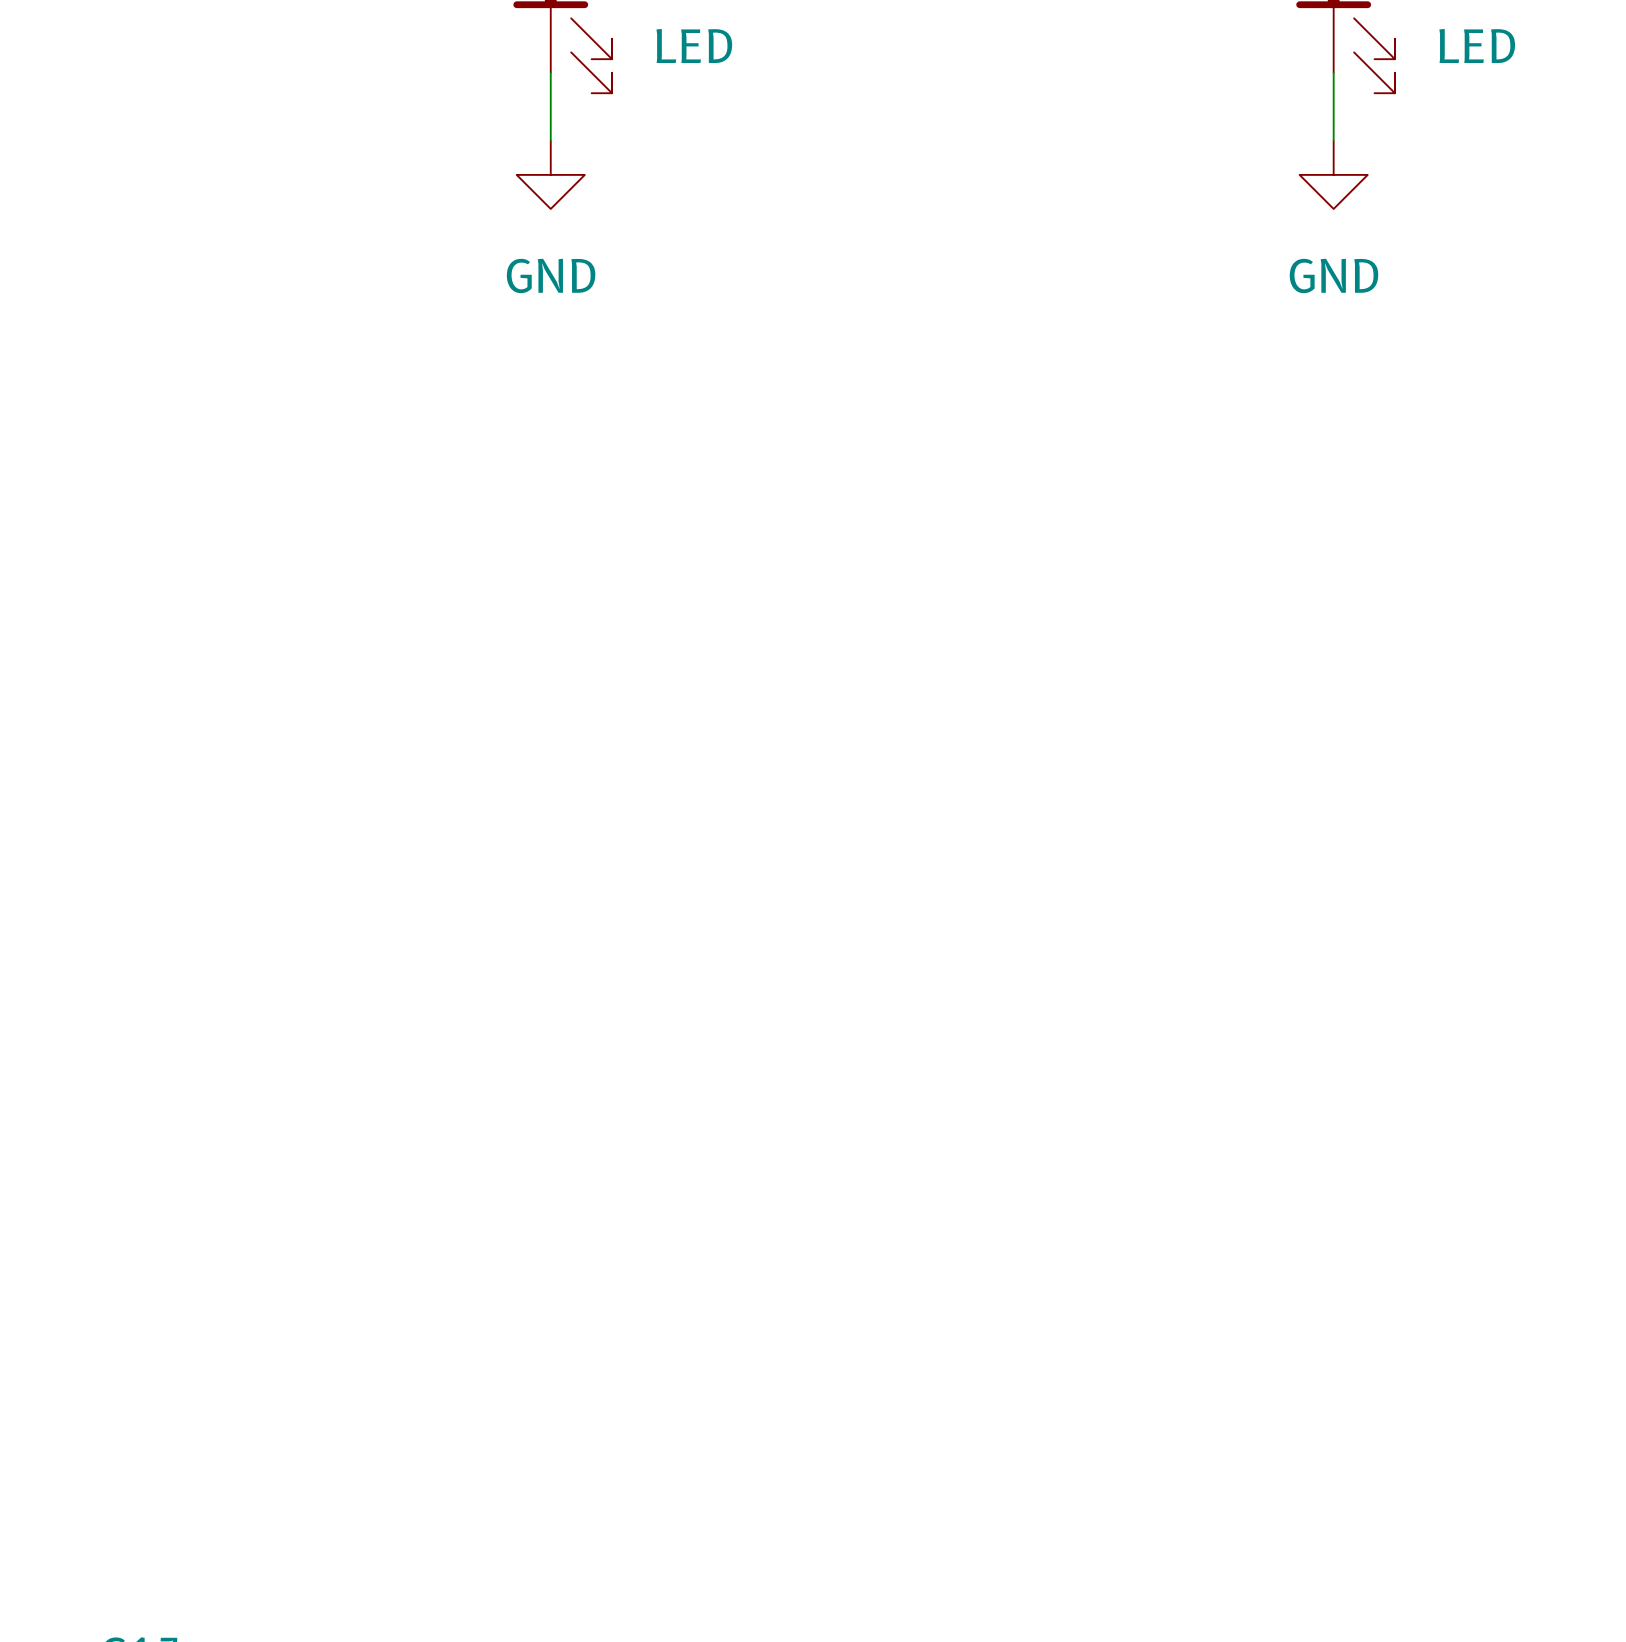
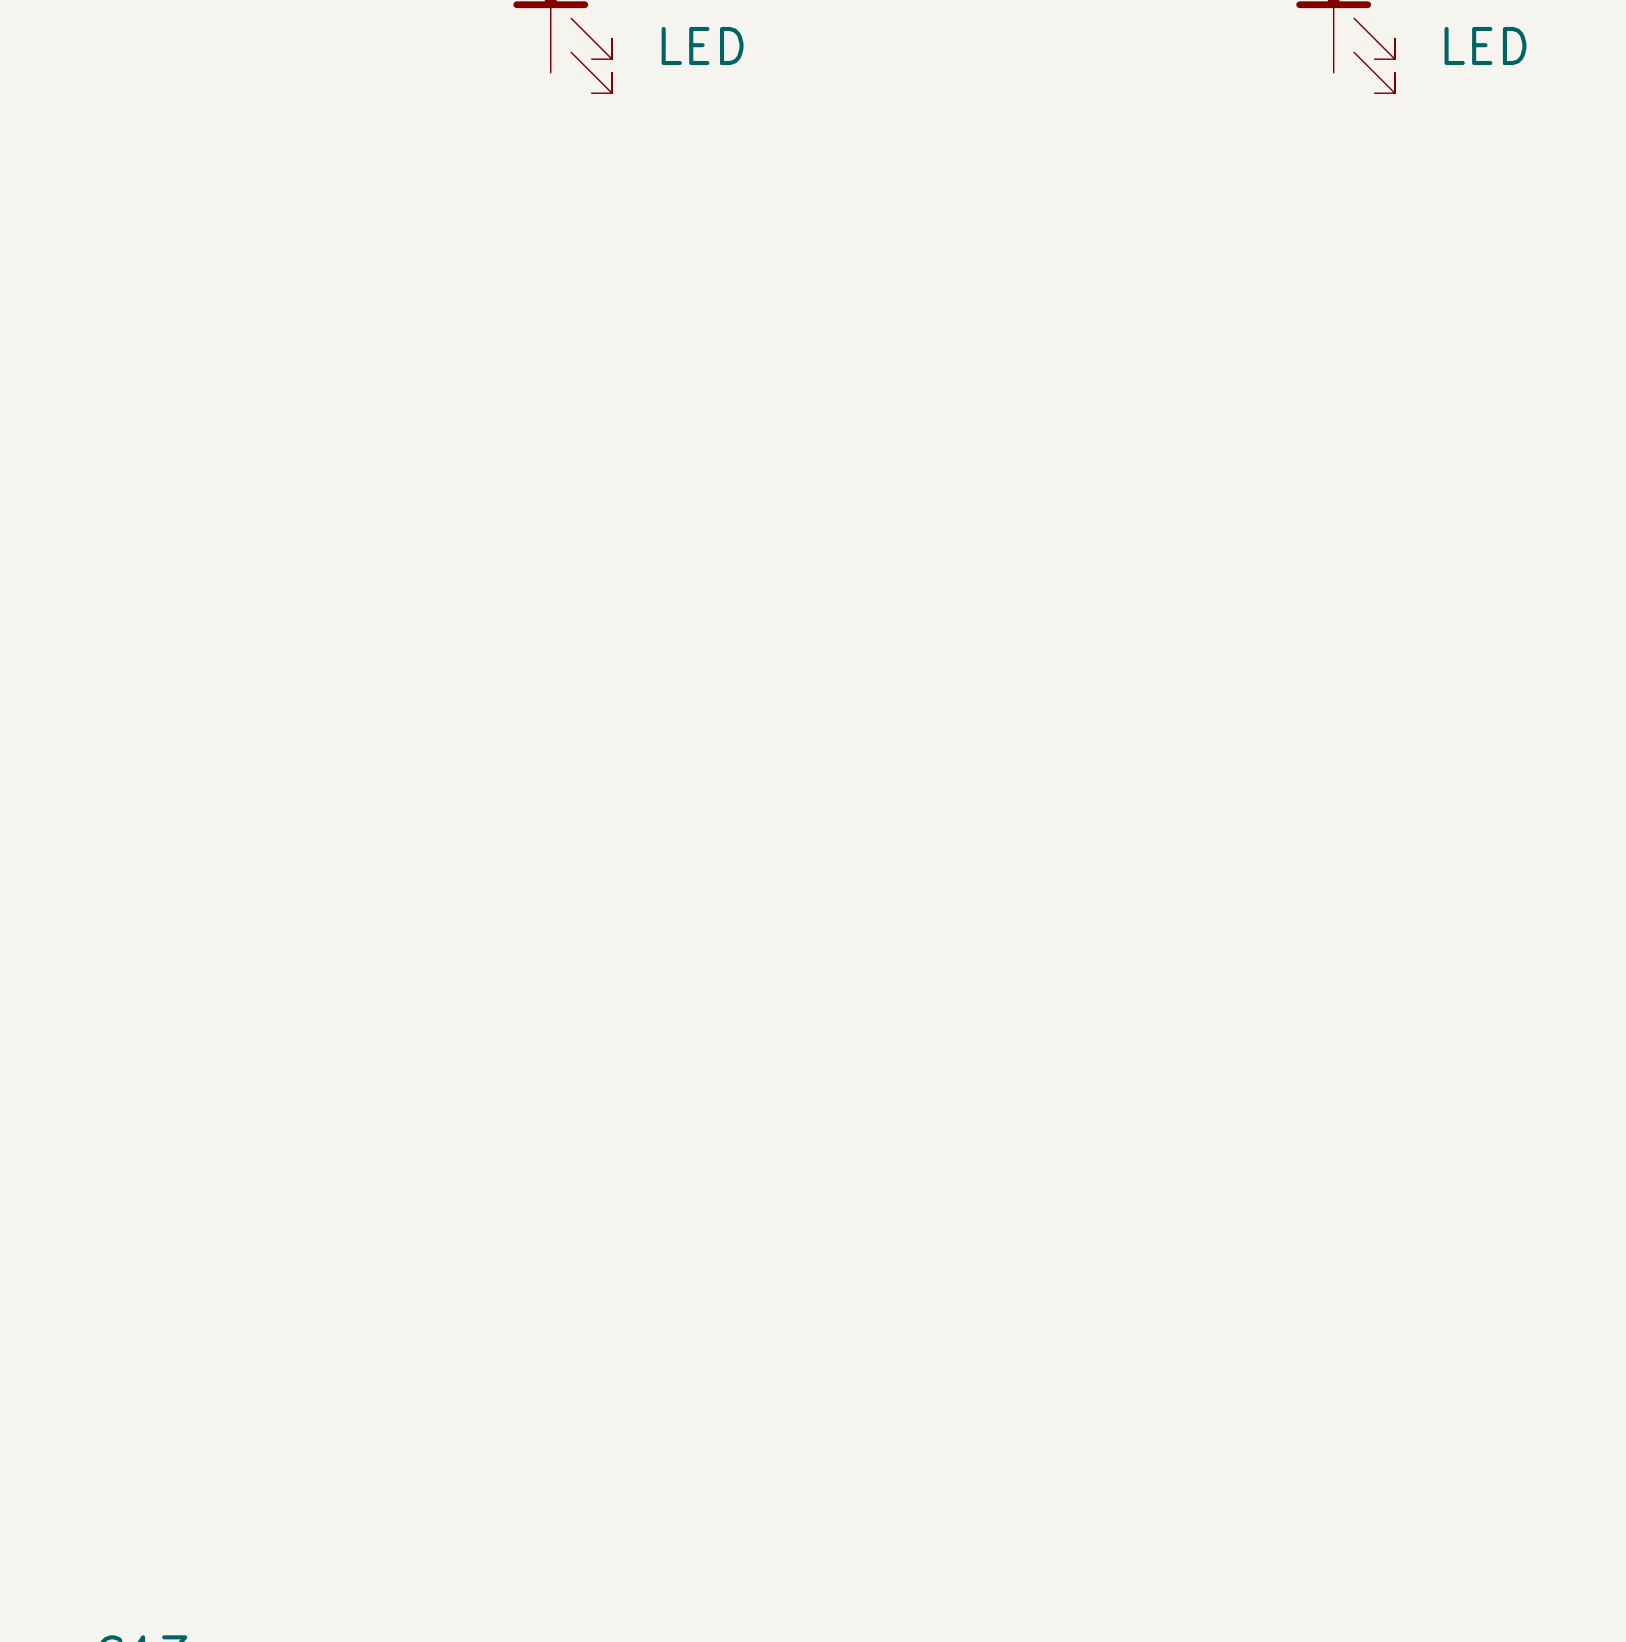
wire: (550, 72) (550, 140) -> none
wire: (1333, 72) (1333, 140) -> none
power symbol: GND (550, 174) -> none
power symbol: GND (1333, 174) -> none

